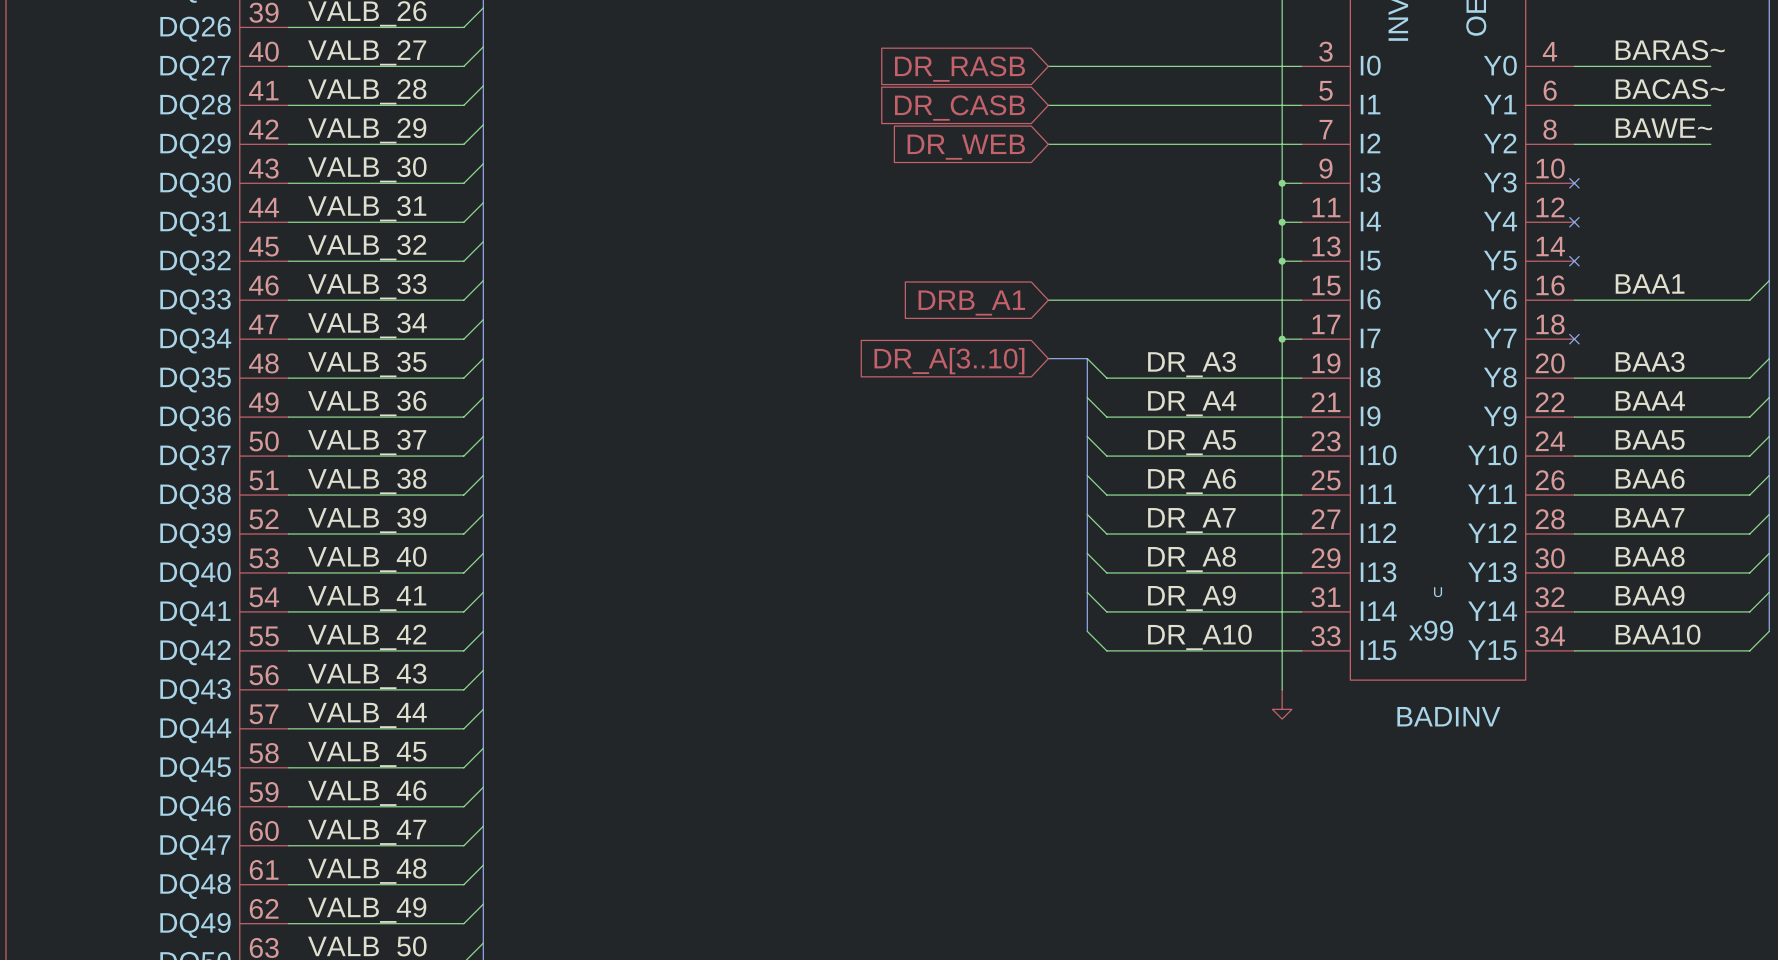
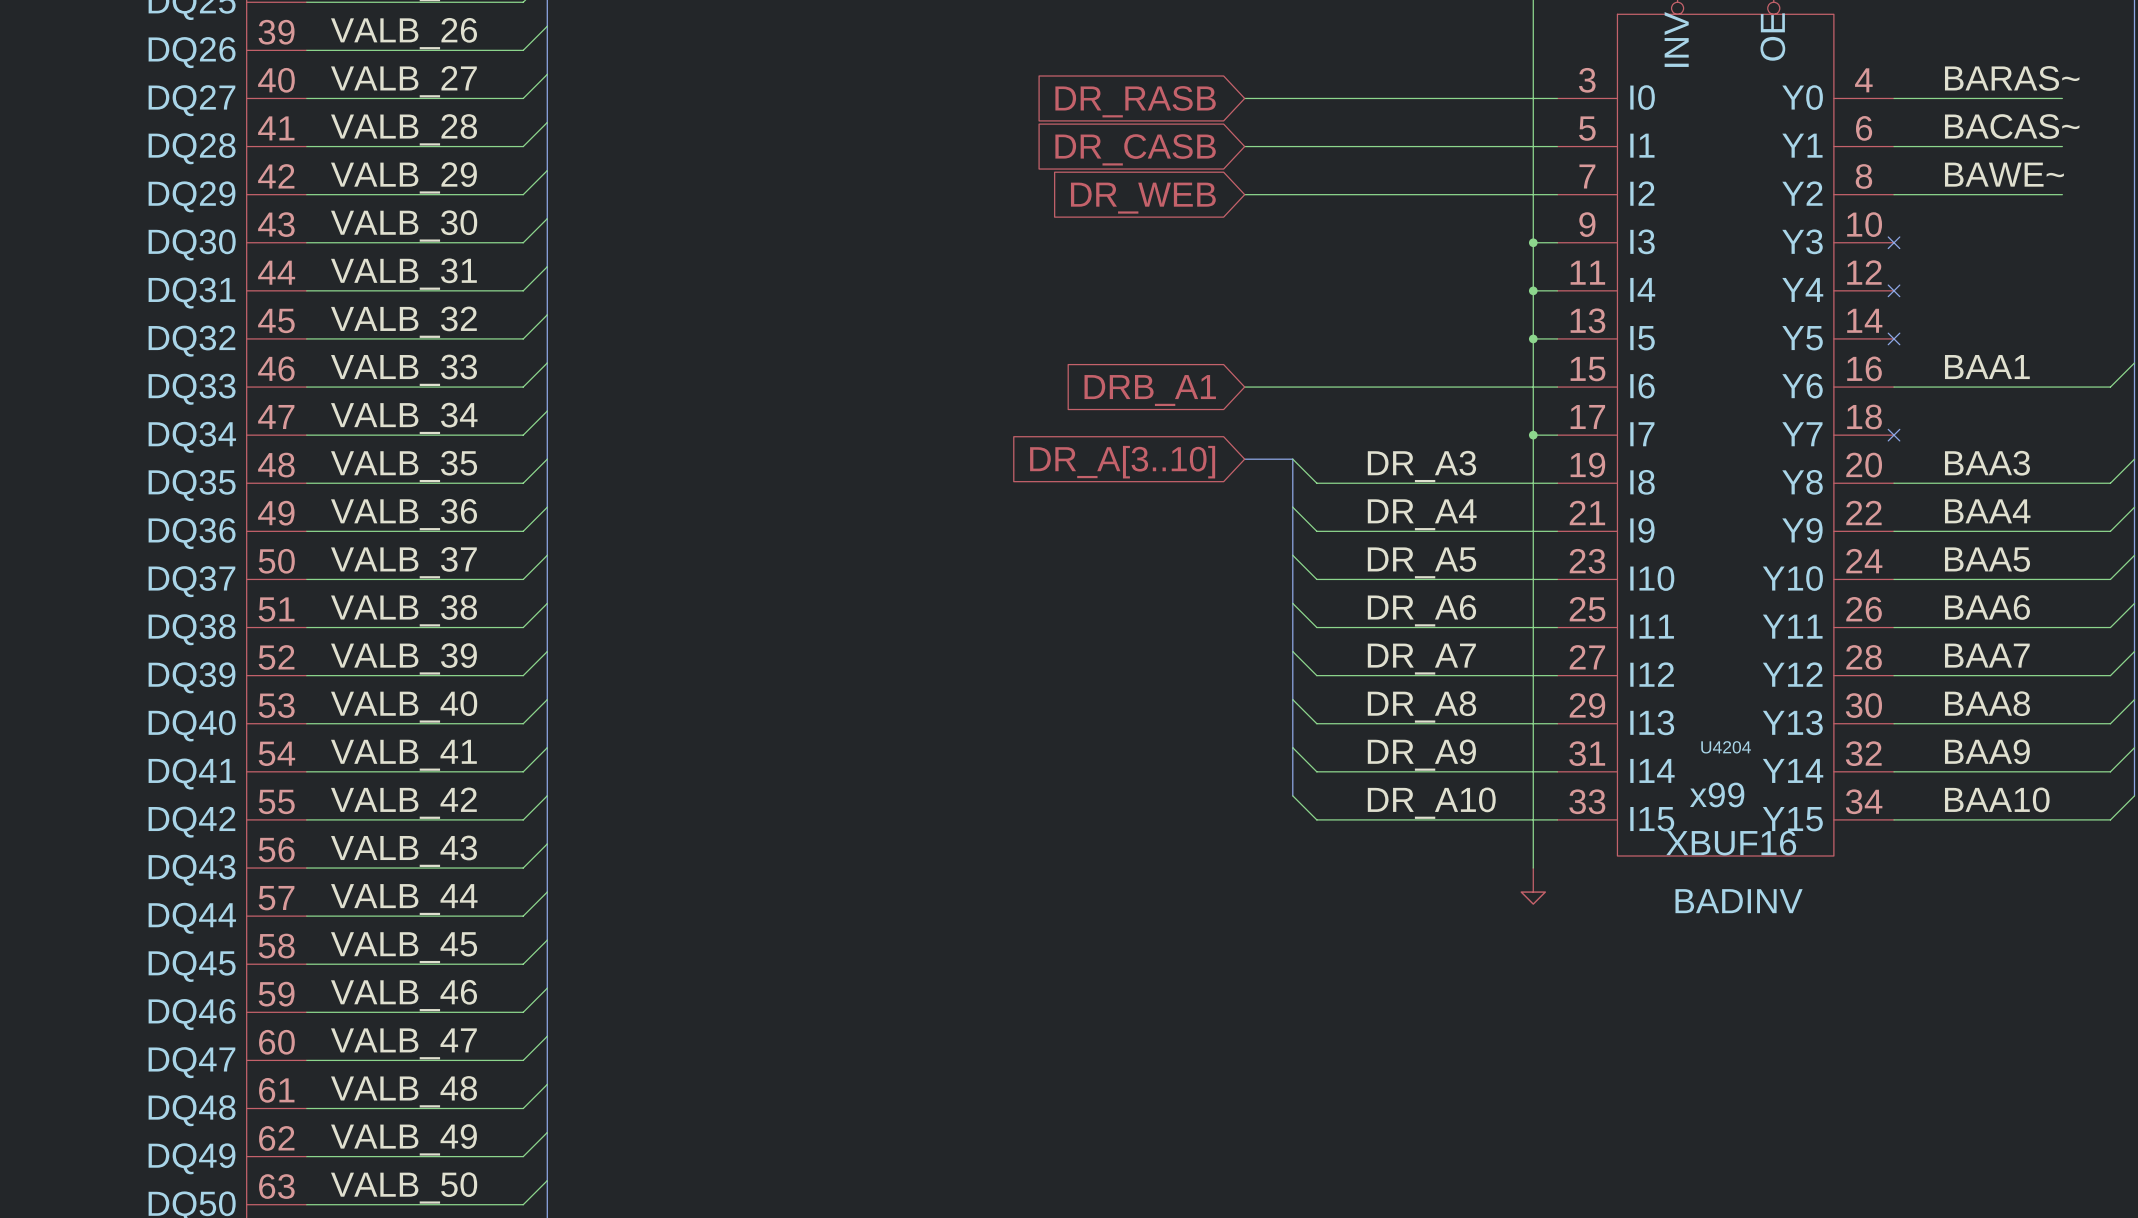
U name: U (1438, 592) -> U4204 (1726, 747)
U value: none -> XBUF16 (1731, 843)

